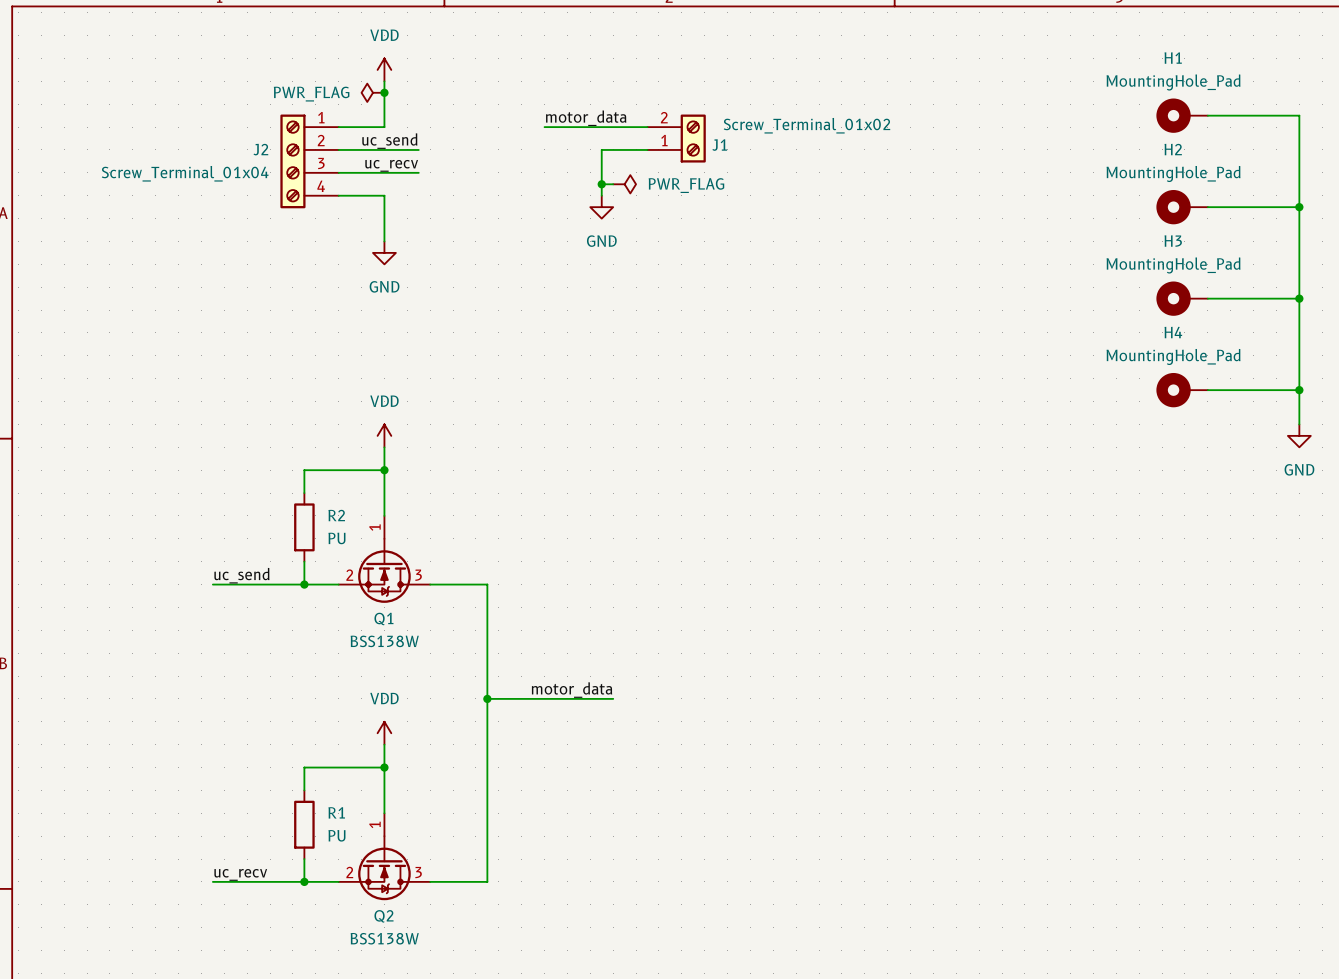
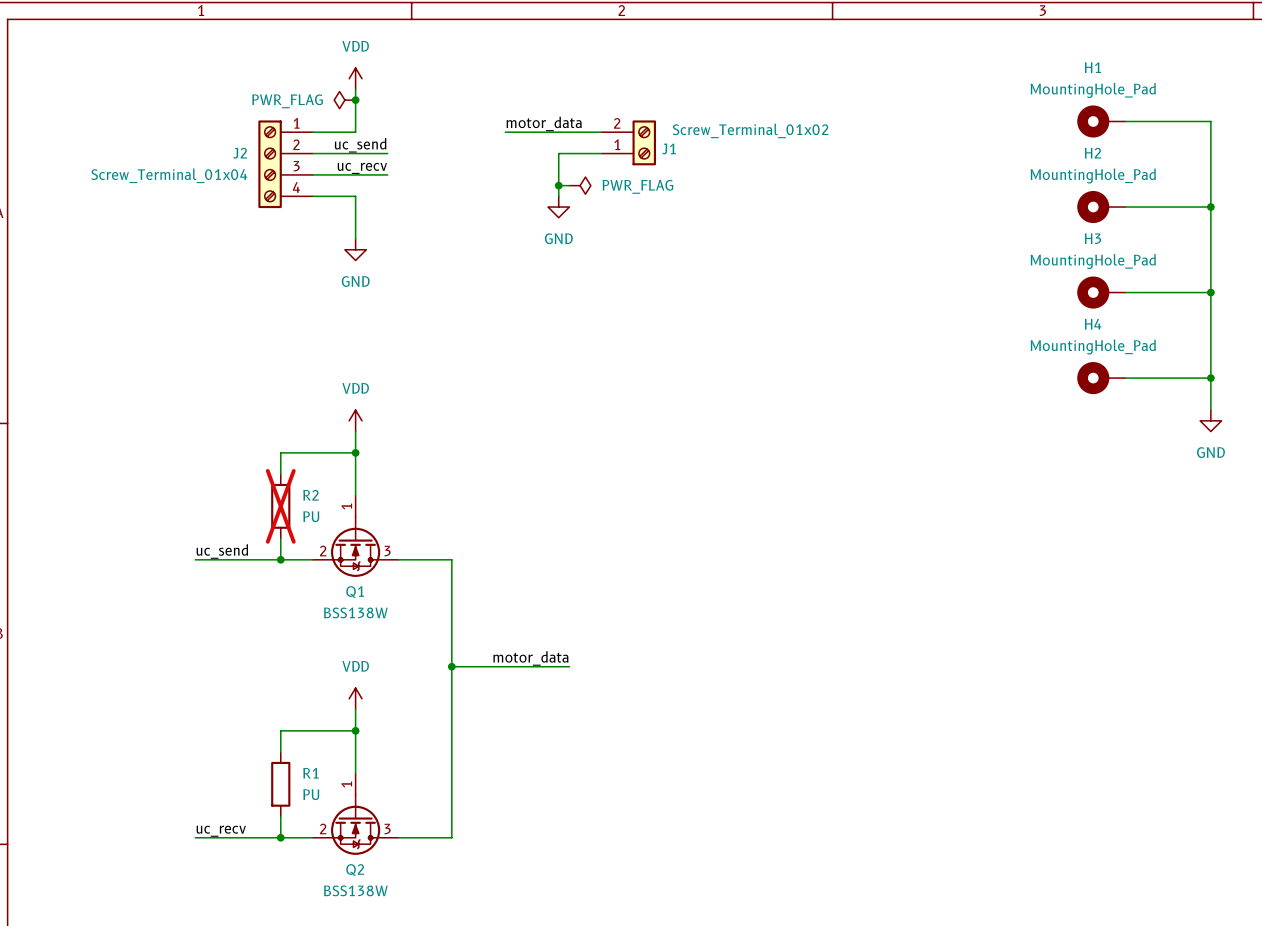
R2 do-not-place cross: none -> (280, 506)

